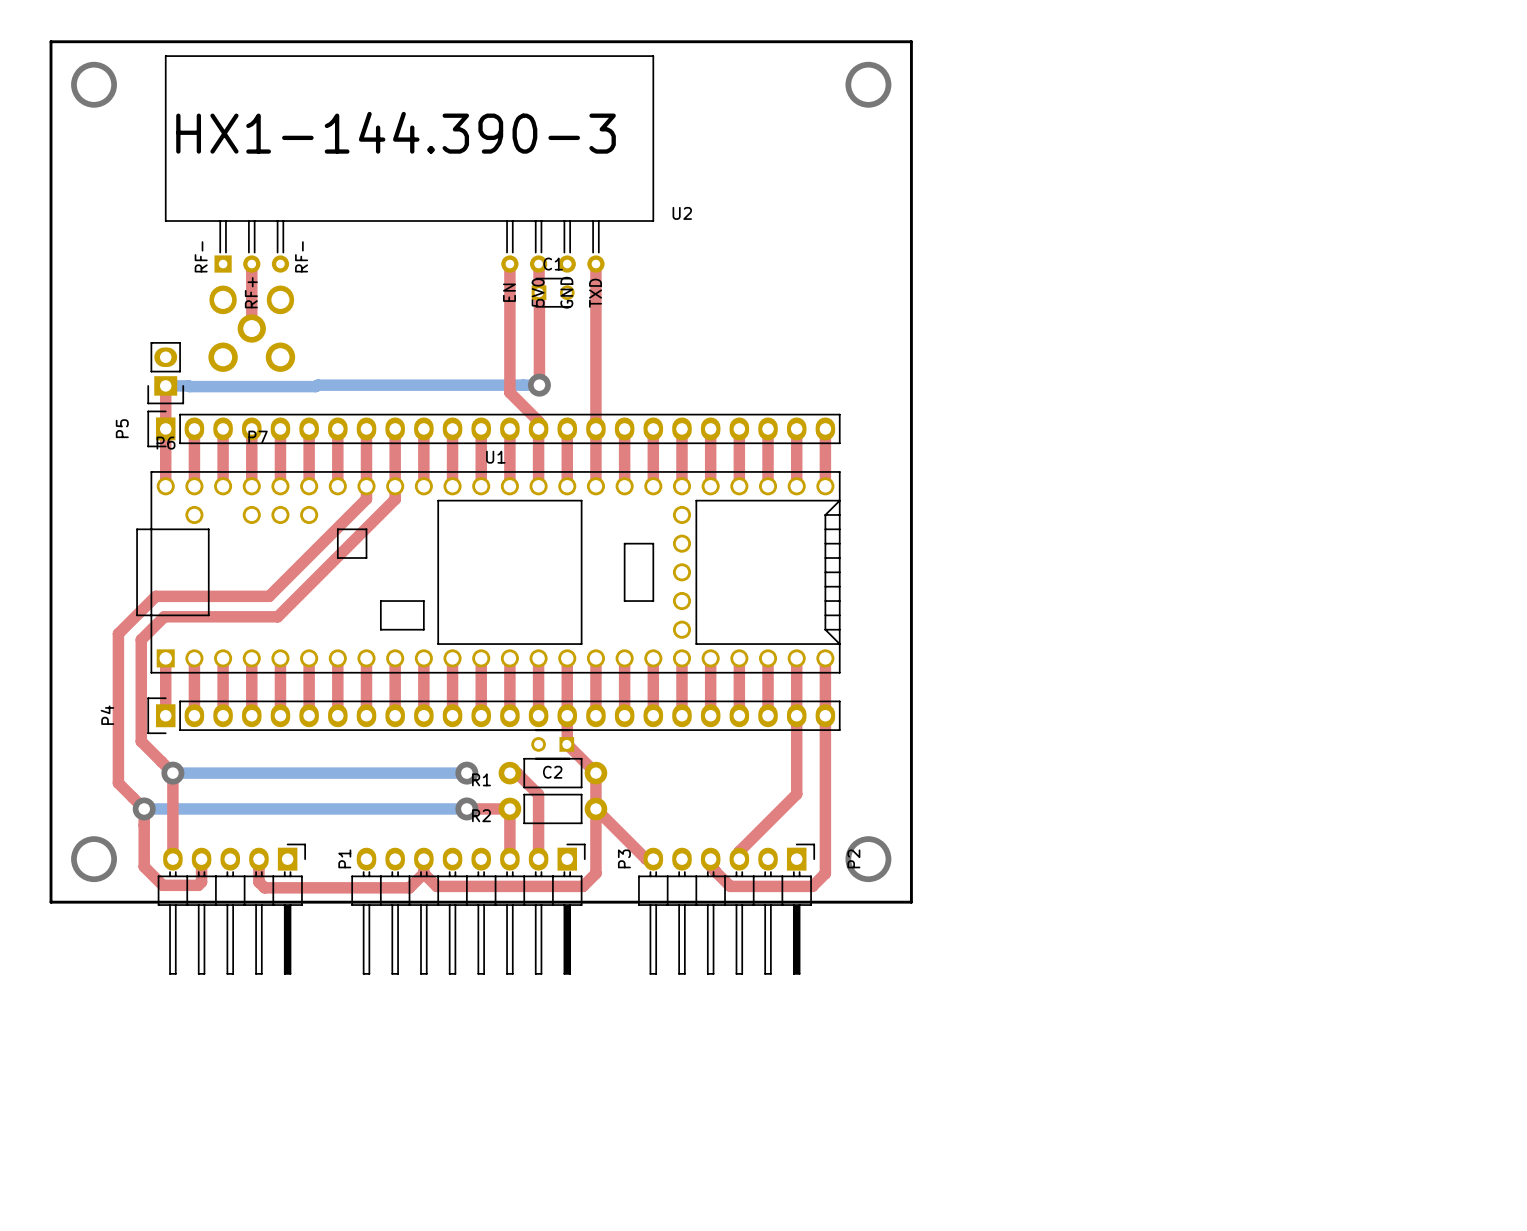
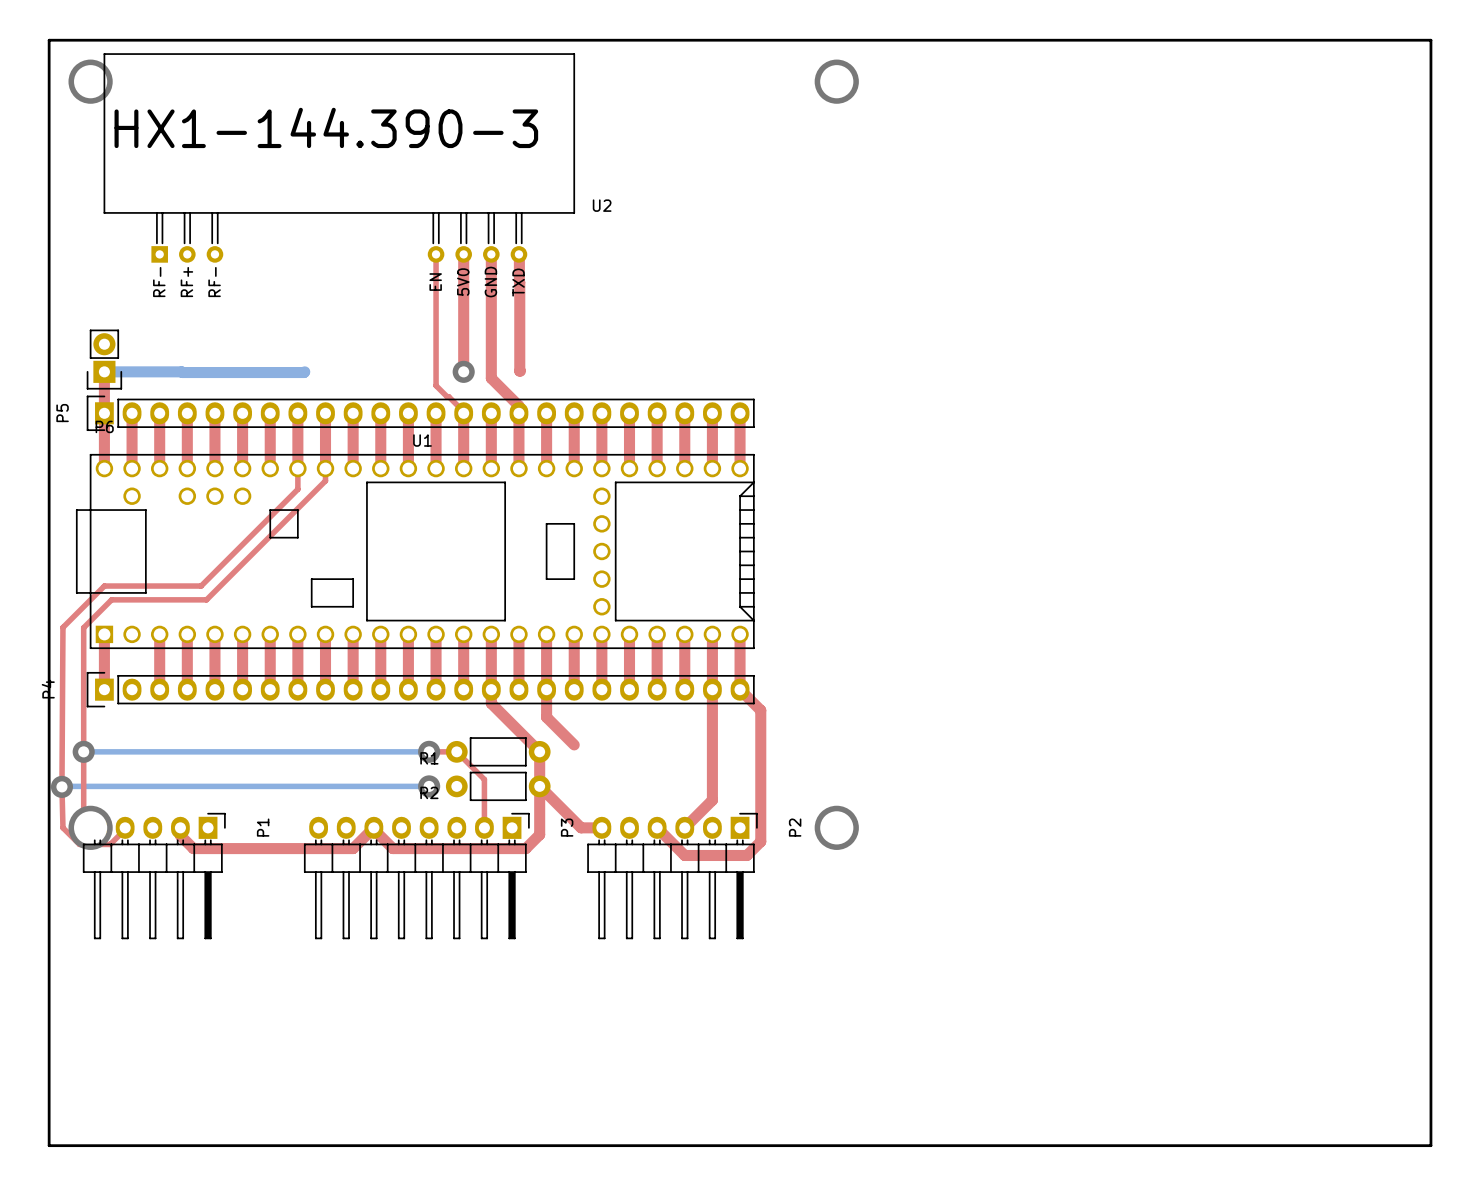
board edge: (911, 41) (911, 902) (51, 902) -> (878, 40) (1430, 40) (1430, 1145) (49, 1145) (49, 869)
U2 position: (409, 163) -> (339, 157)
U2 text position: RF- (201, 256) -> RF- (159, 282)
U2 text position: RF- (301, 256) -> RF- (214, 282)
top track: (251, 264) (251, 328) -> none
top track: none -> (436, 254) (436, 385) (463, 413)
top track: none -> (463, 254) (463, 371)
top track: (595, 264) (595, 428) -> none
C1: (553, 292) -> none
P7: (251, 328) -> none
P6 footprint: [147, 342, 185, 405] -> [86, 329, 123, 390]
top track: none -> (104, 371) (104, 468)
bottom track: none -> (104, 371) (159, 371)
top track: (165, 385) (165, 428) -> none
bottom track: (539, 385) (317, 385) -> none
via position: (539, 385) -> (463, 371)
top track: none -> (132, 413) (132, 468)
P5 position: (493, 428) -> (420, 413)
top track: (796, 428) (796, 486) -> none
top track: (825, 428) (825, 486) -> none
top track: none -> (297, 468) (297, 489) (201, 586) (104, 586) (62, 627) (62, 827) (79, 844) (110, 844) (125, 827)
top track: none -> (325, 468) (325, 480) (206, 599) (111, 599) (83, 627) (83, 746)
top track: (366, 486) (366, 499) (269, 596) (155, 596) (118, 633) (118, 783) (144, 808) (144, 866) (162, 885) (198, 885) (201, 882) (201, 859) -> none
top track: (395, 486) (395, 499) (277, 616) (164, 616) (141, 639) (141, 741) (172, 773) (172, 859) -> none
U1 position: (488, 572) -> (415, 551)
top track: none -> (104, 634) (104, 689)
top track: (796, 658) (796, 794) (739, 851) (739, 859) -> none
top track: (825, 658) (825, 873) (812, 886) (730, 886) (710, 866) (710, 859) -> (712, 689) (712, 800) (684, 827)
P4 position: (493, 715) -> (420, 689)
top track: none -> (491, 689) (491, 703) (539, 751) (539, 834) (525, 848) (392, 848) (373, 827) (353, 848) (193, 848) (180, 835) (180, 827)
top track: none -> (740, 689) (760, 710) (760, 841) (746, 855) (684, 855) (657, 827)
C2: (552, 744) -> none
bottom track: (172, 773) (466, 773) -> none
via: (172, 773) -> none
via: (466, 773) -> none
top track: (509, 773) (517, 773) (538, 794) (538, 859) -> none
R1 position: (552, 773) -> (498, 751)
top track: none -> (83, 751) (83, 814) (97, 827)
bottom track: none -> (83, 751) (429, 751)
via: none -> (83, 751)
top track: none -> (429, 751) (456, 751) (484, 779) (484, 827)
via: none -> (429, 751)
top track: (595, 780) (595, 873) (583, 886) (436, 886) (423, 873) -> none
bottom track: (144, 808) (466, 808) -> none
via: (144, 808) -> none
top track: (466, 808) (509, 808) (509, 859) -> none
via: (466, 808) -> none
R2 position: (552, 808) -> (498, 786)
top track: (595, 808) (646, 859) (653, 859) -> none
via: none -> (61, 786)
bottom track: none -> (429, 786) (61, 786)
via: none -> (429, 786)
top track: none -> (539, 786) (581, 827) (601, 827)
top track: (258, 859) (258, 882) (264, 887) (409, 887) (423, 873) -> none
P1 position: (231, 909) -> (154, 876)
P3 position: (468, 909) -> (416, 876)
P2 position: (726, 909) -> (672, 876)

